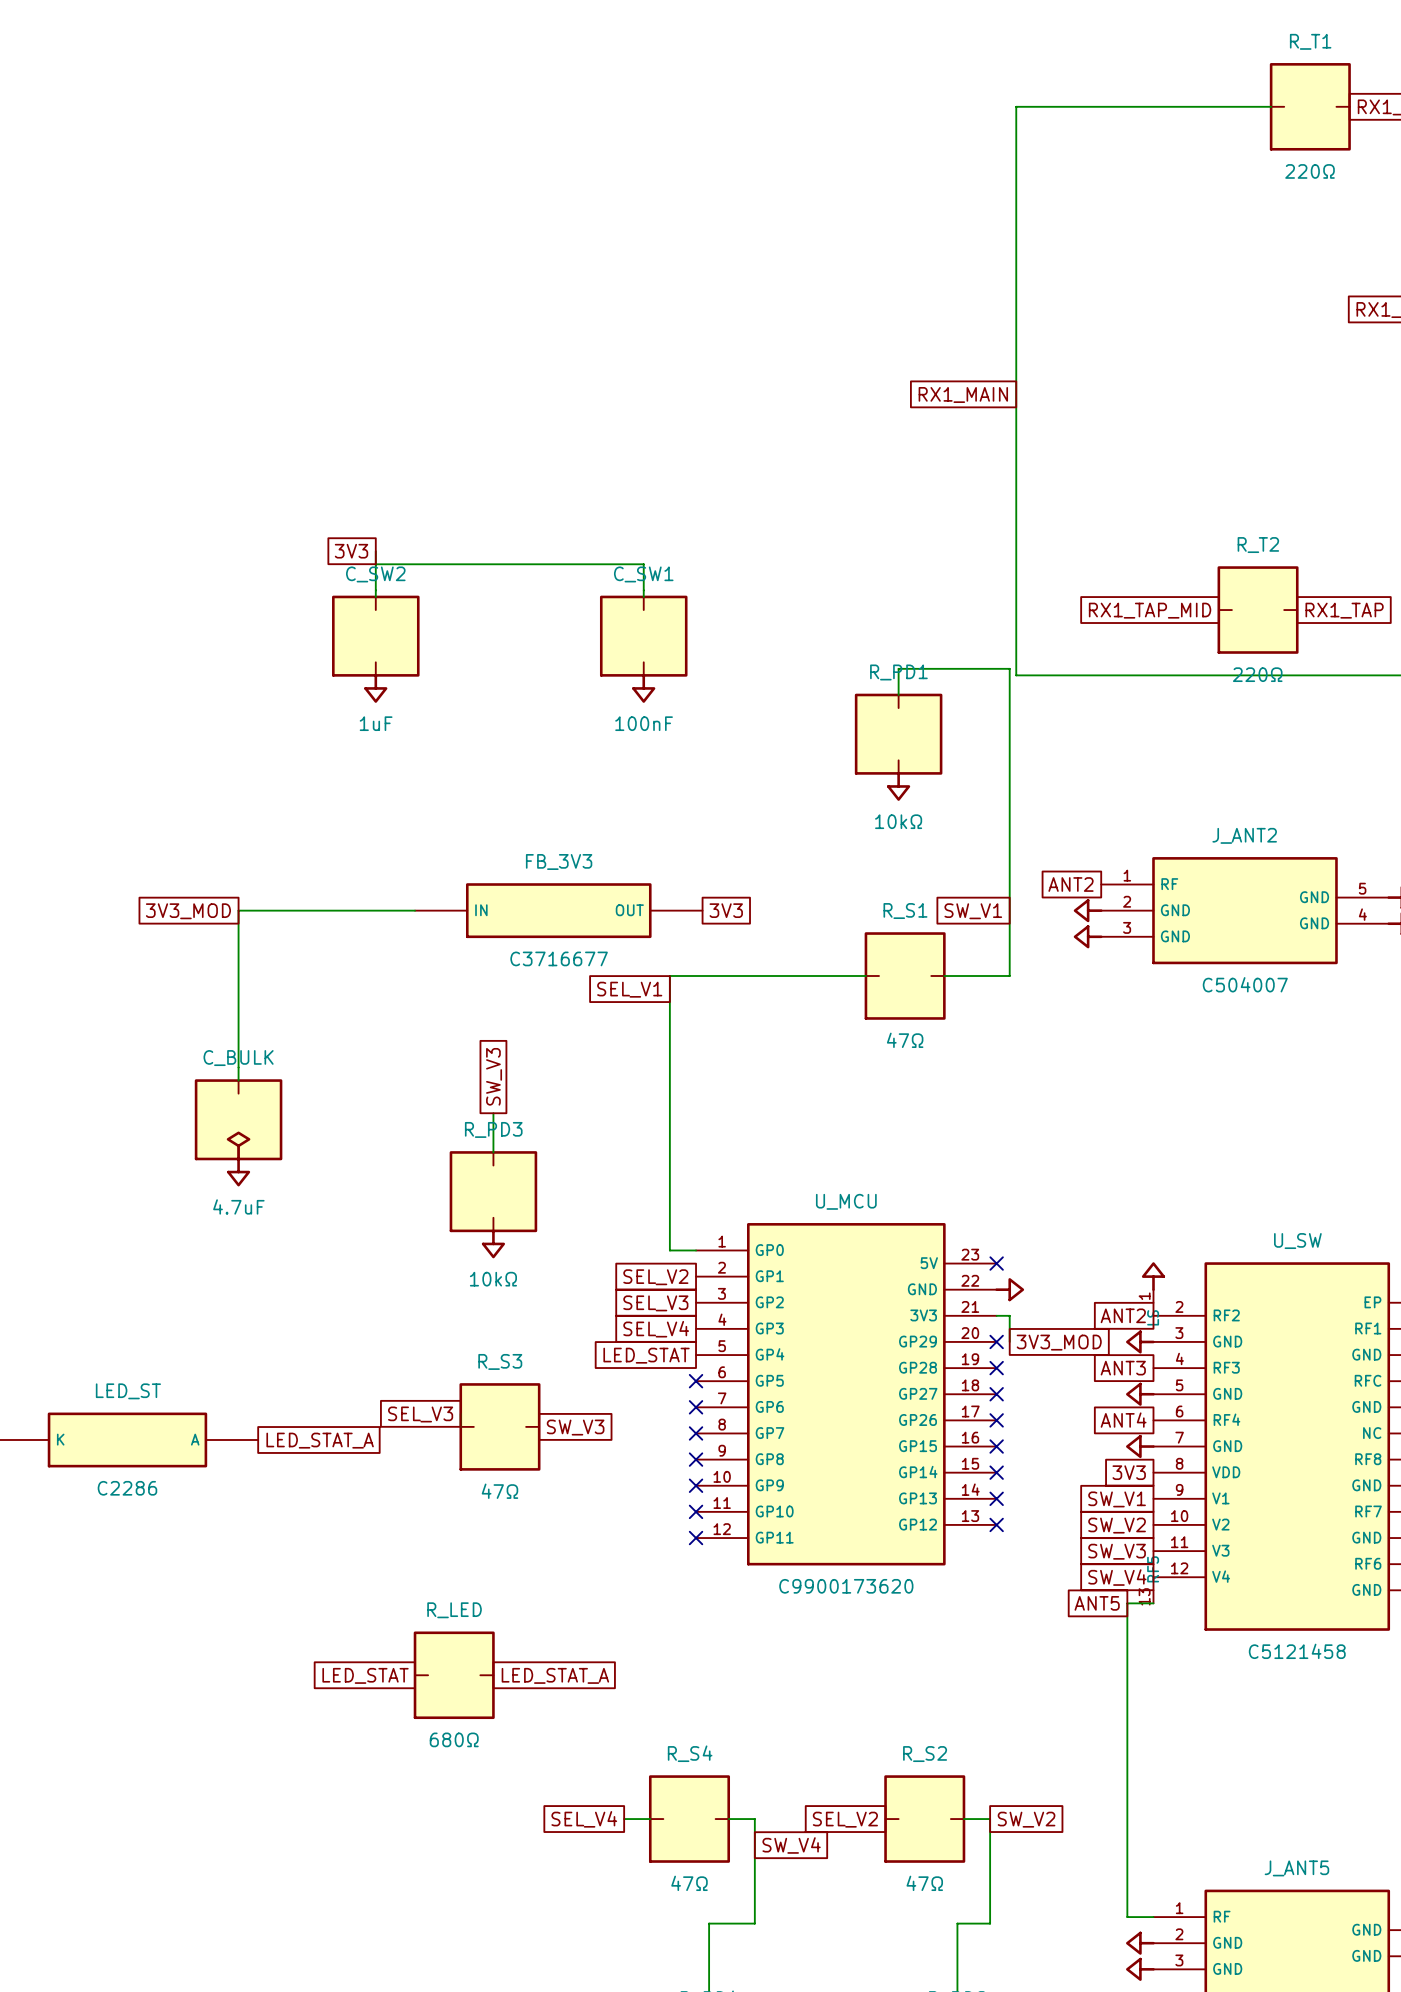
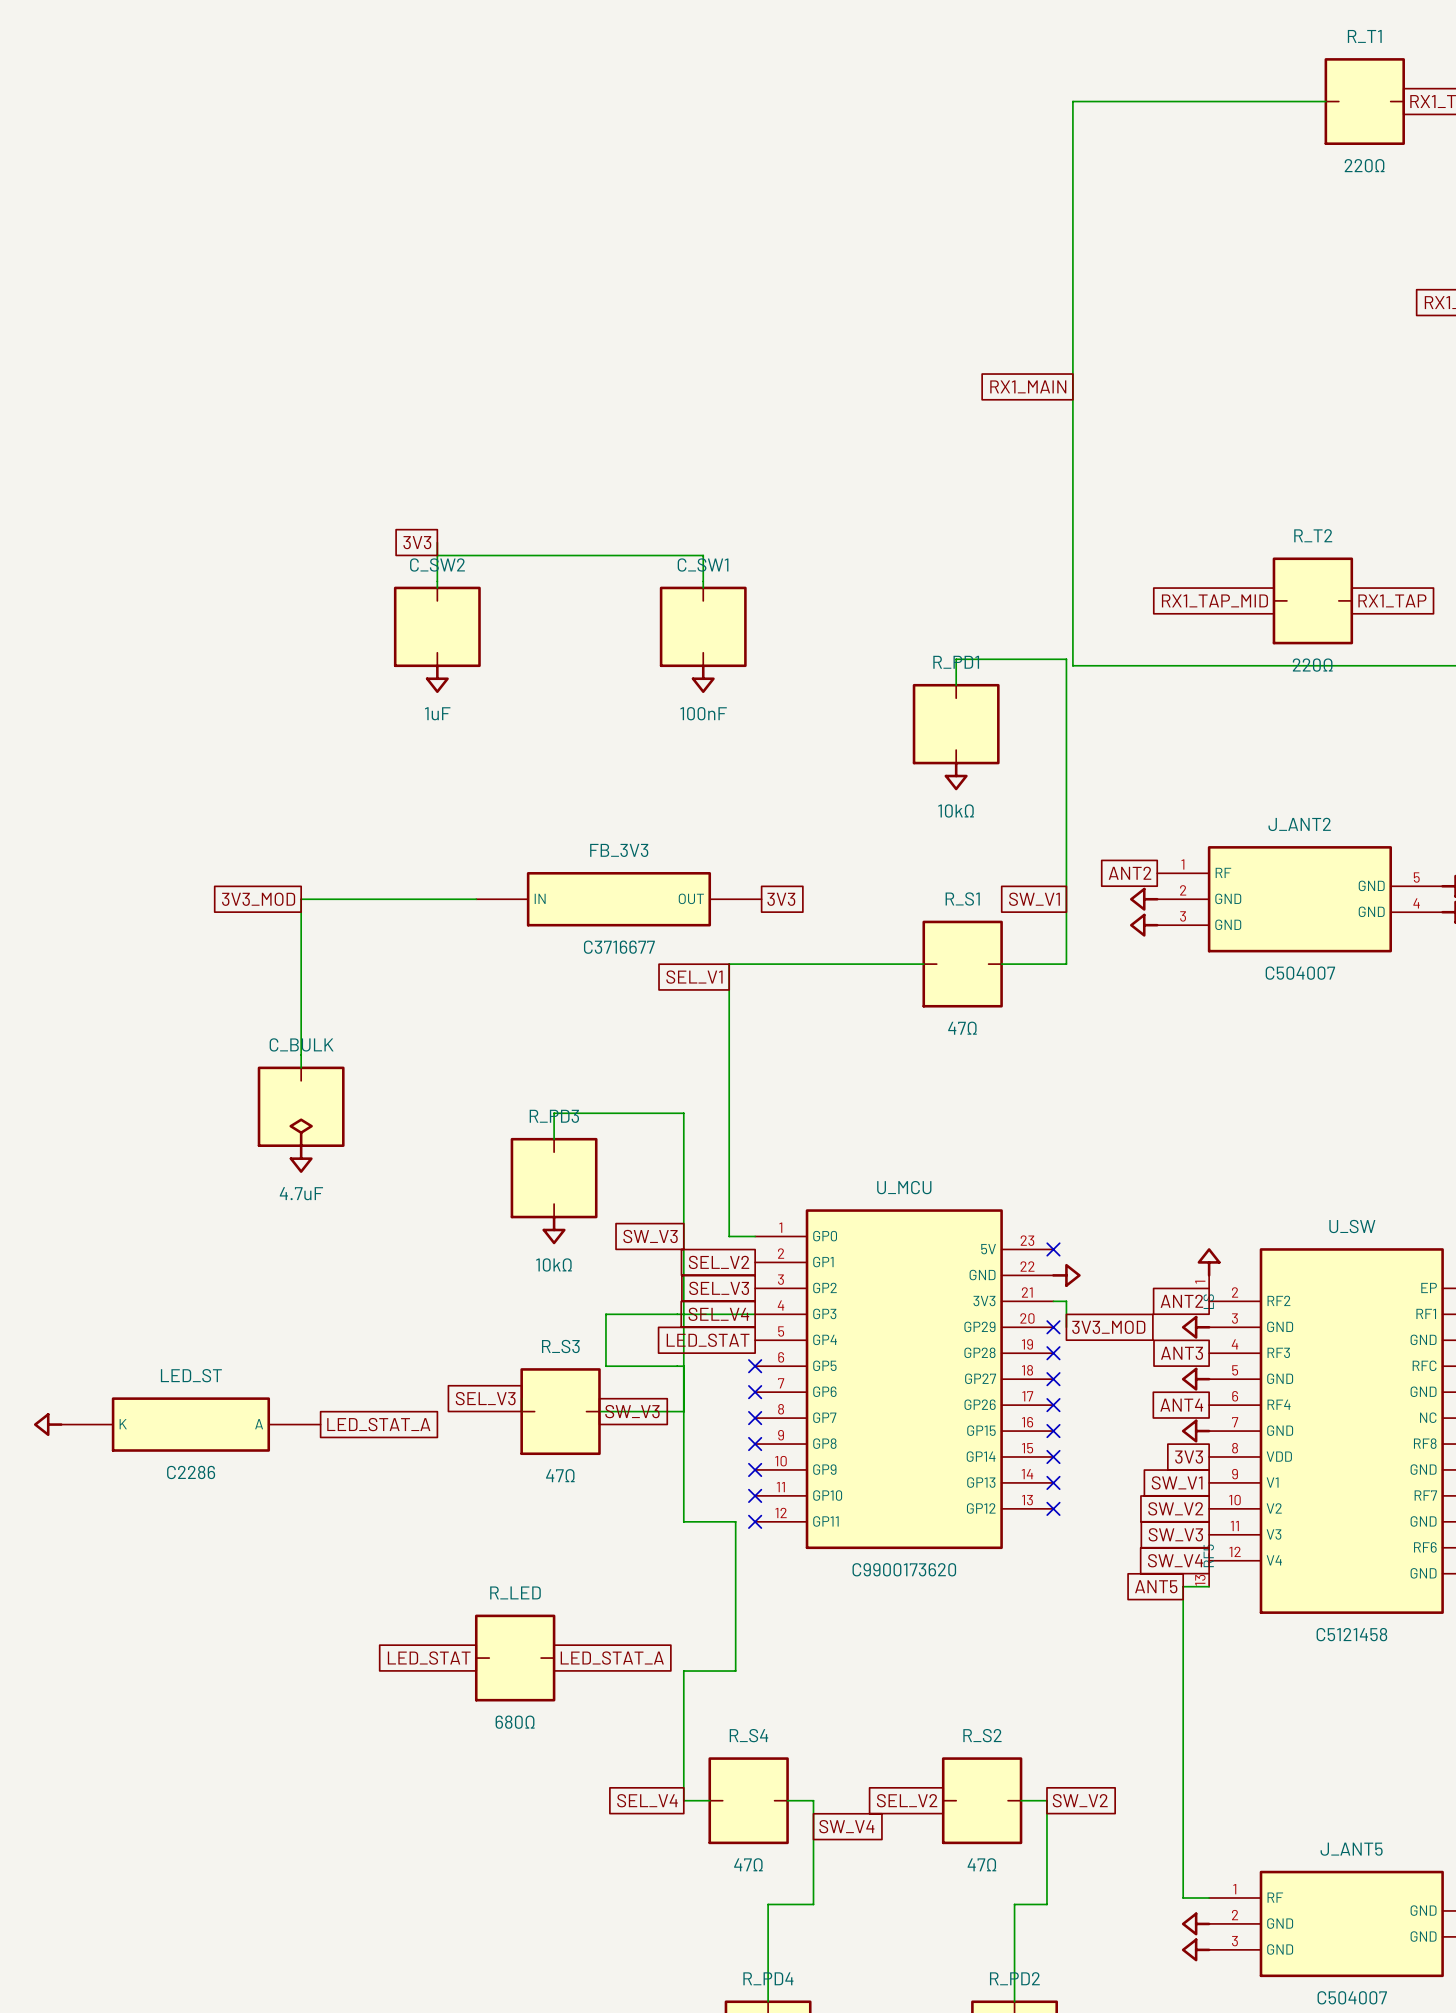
global label rotation: 0° (494, 1076) -> 90° counterclockwise (650, 1236)
global label position: SW_V3 (494, 1076) -> SW_V3 (650, 1236)
wire: (493, 1113) (493, 1126) -> (683, 1800) (683, 1671) (735, 1671) (735, 1521) (683, 1521) (683, 1113) (554, 1113)
wire: none -> (755, 1314) (605, 1314) (605, 1366) (683, 1366)
wire: none -> (599, 1411) (683, 1411)

